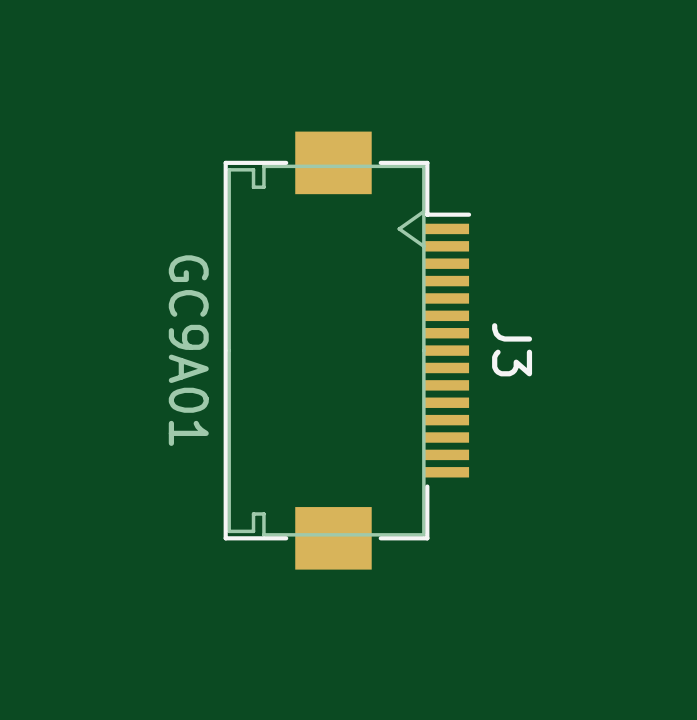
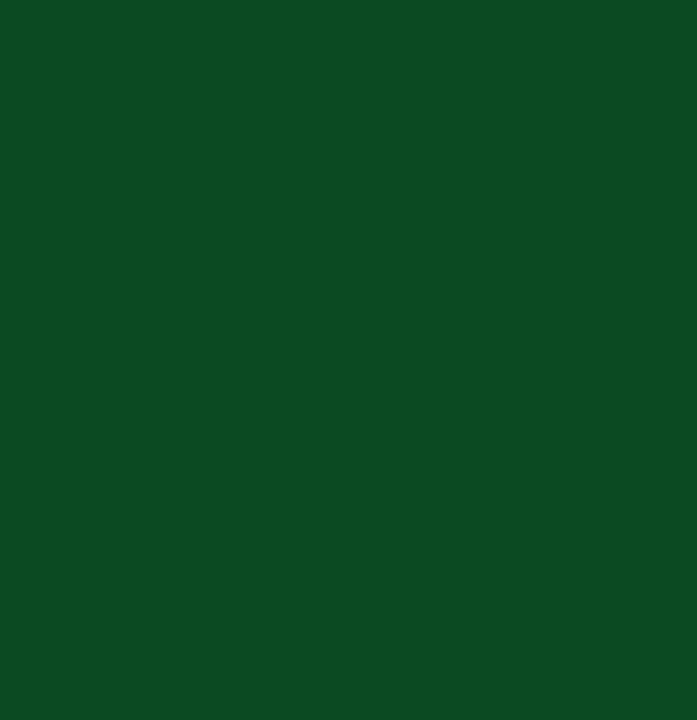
J3: GC9A01 (347, 350) -> none

